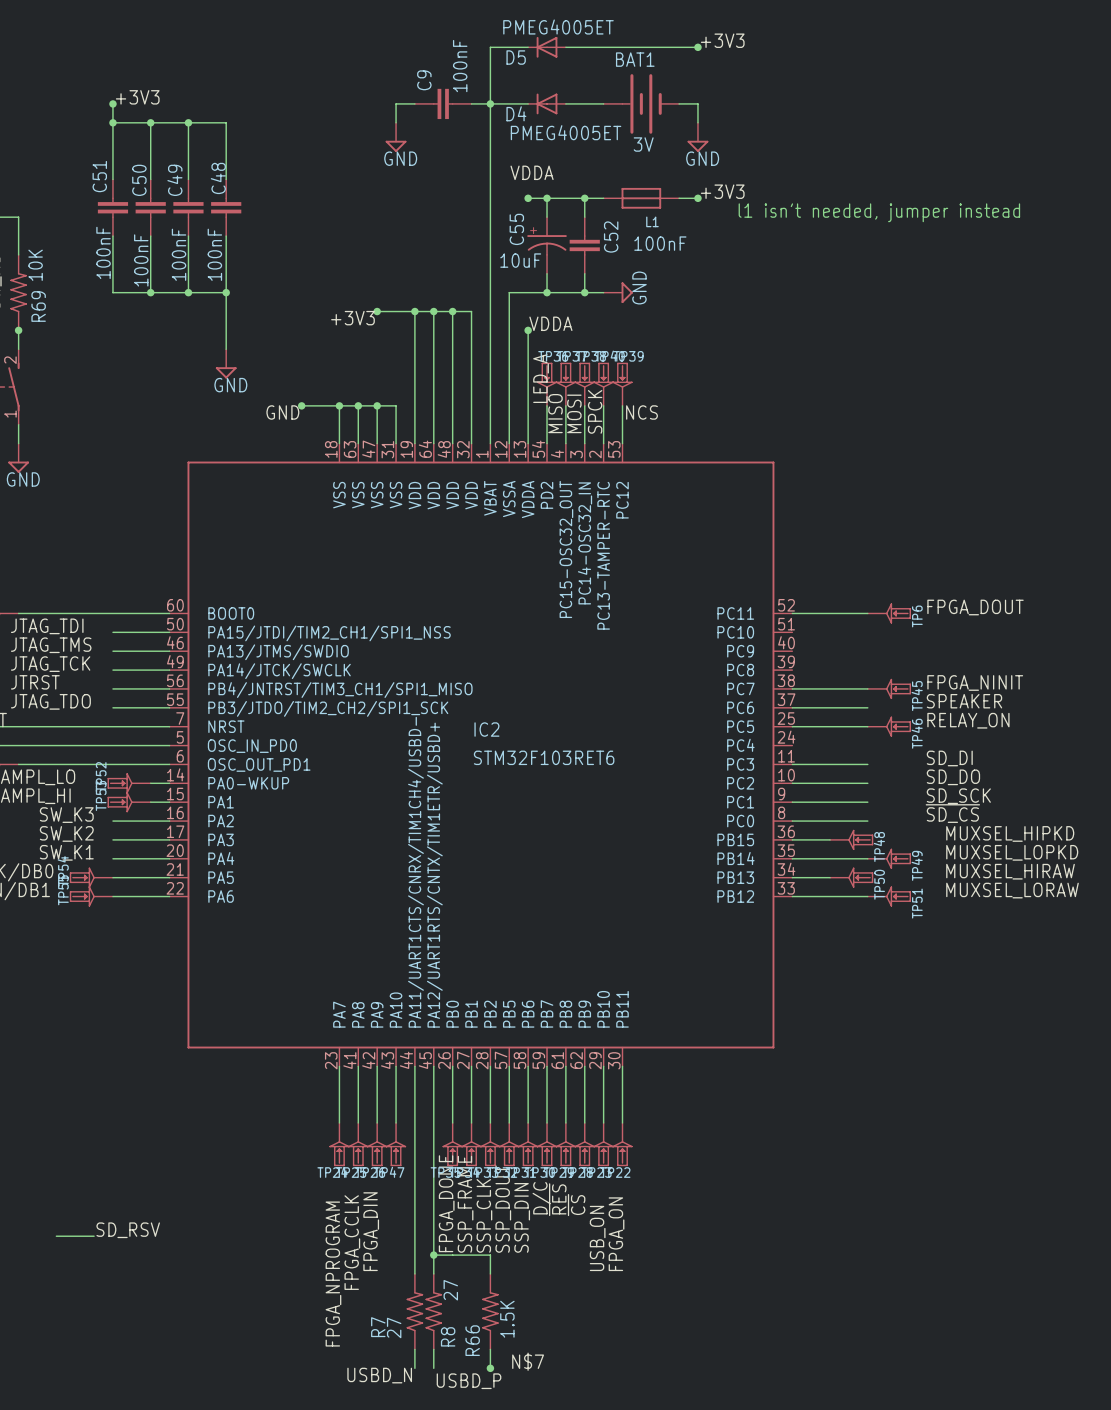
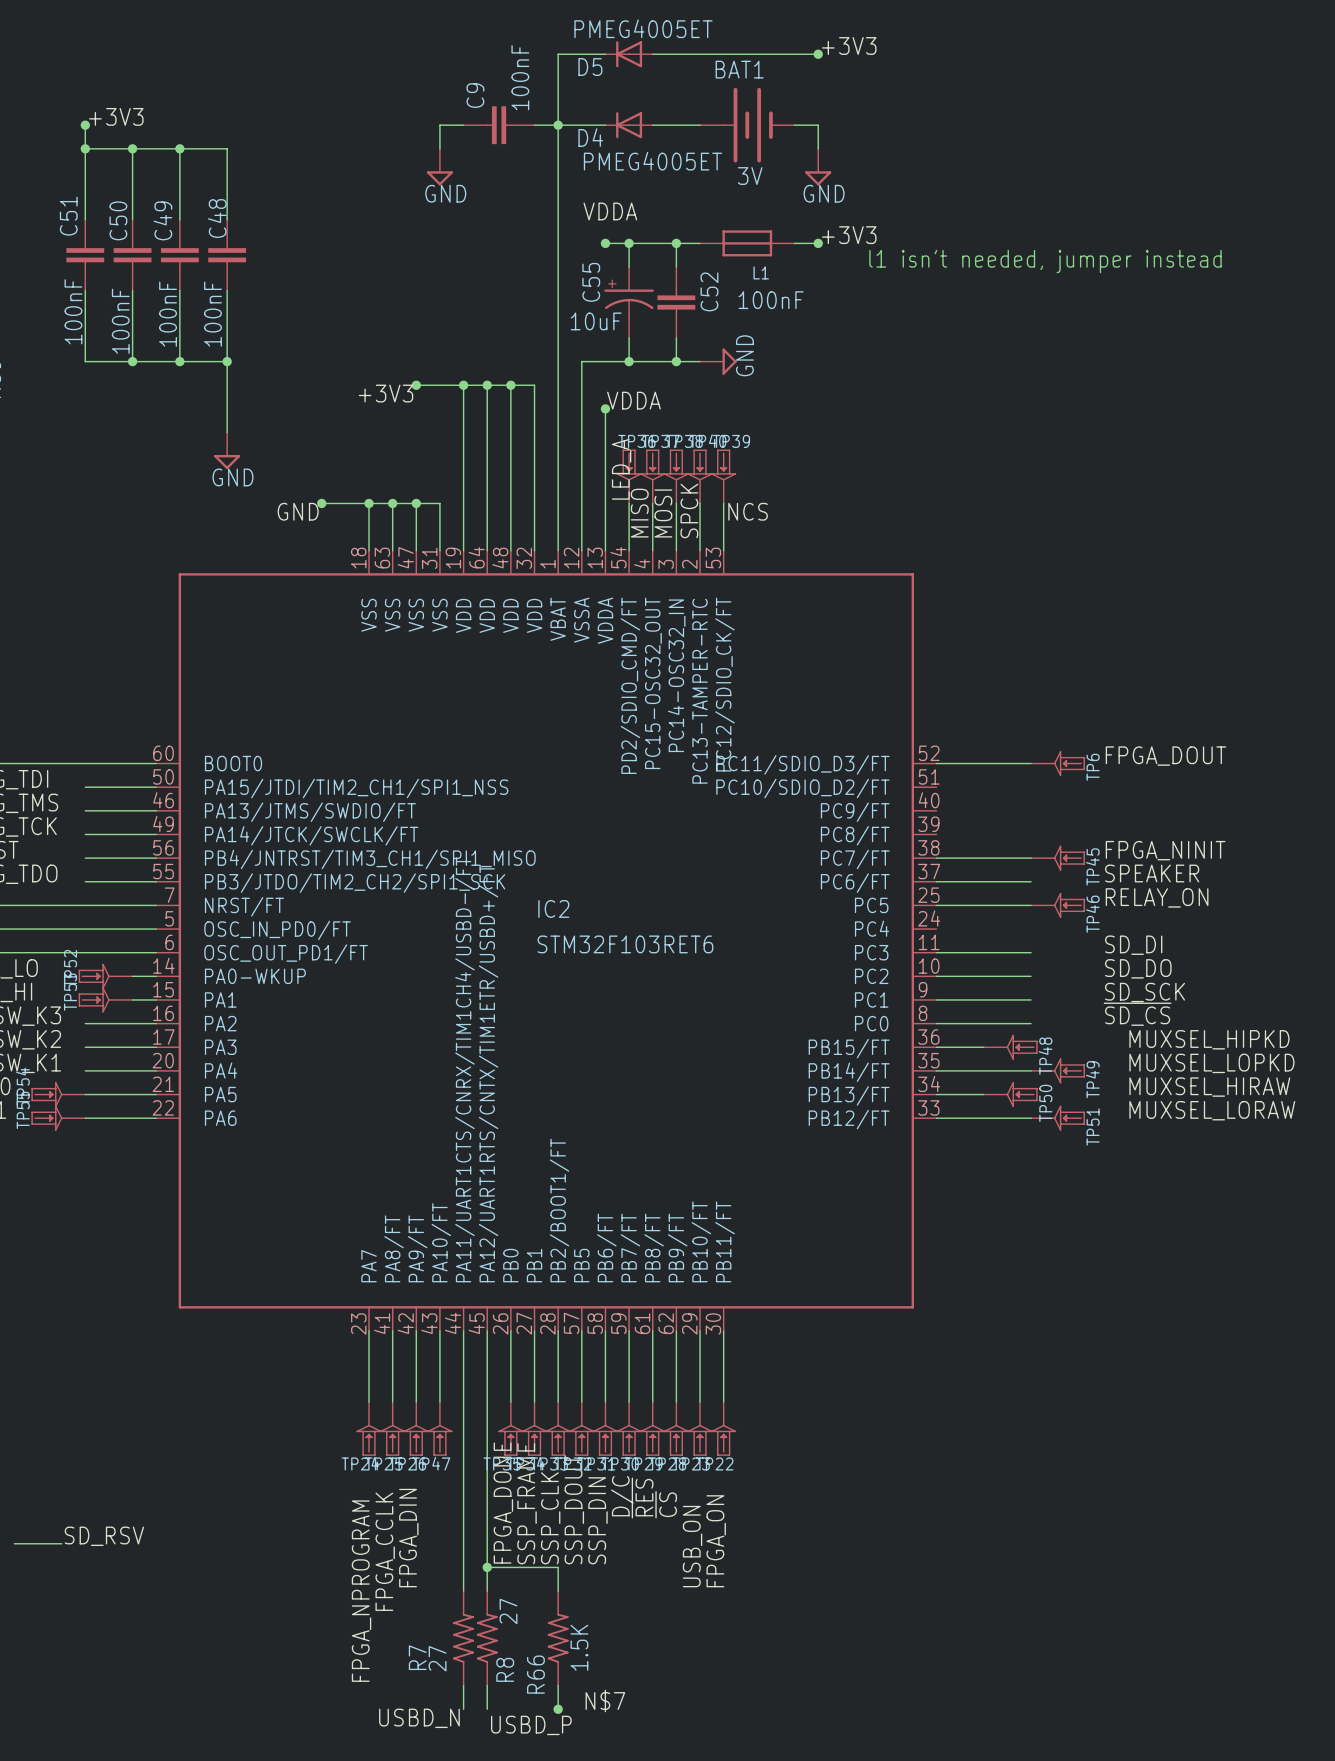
IC2 symbol: [169, 443, 793, 1067] -> [156, 550, 937, 1331]

